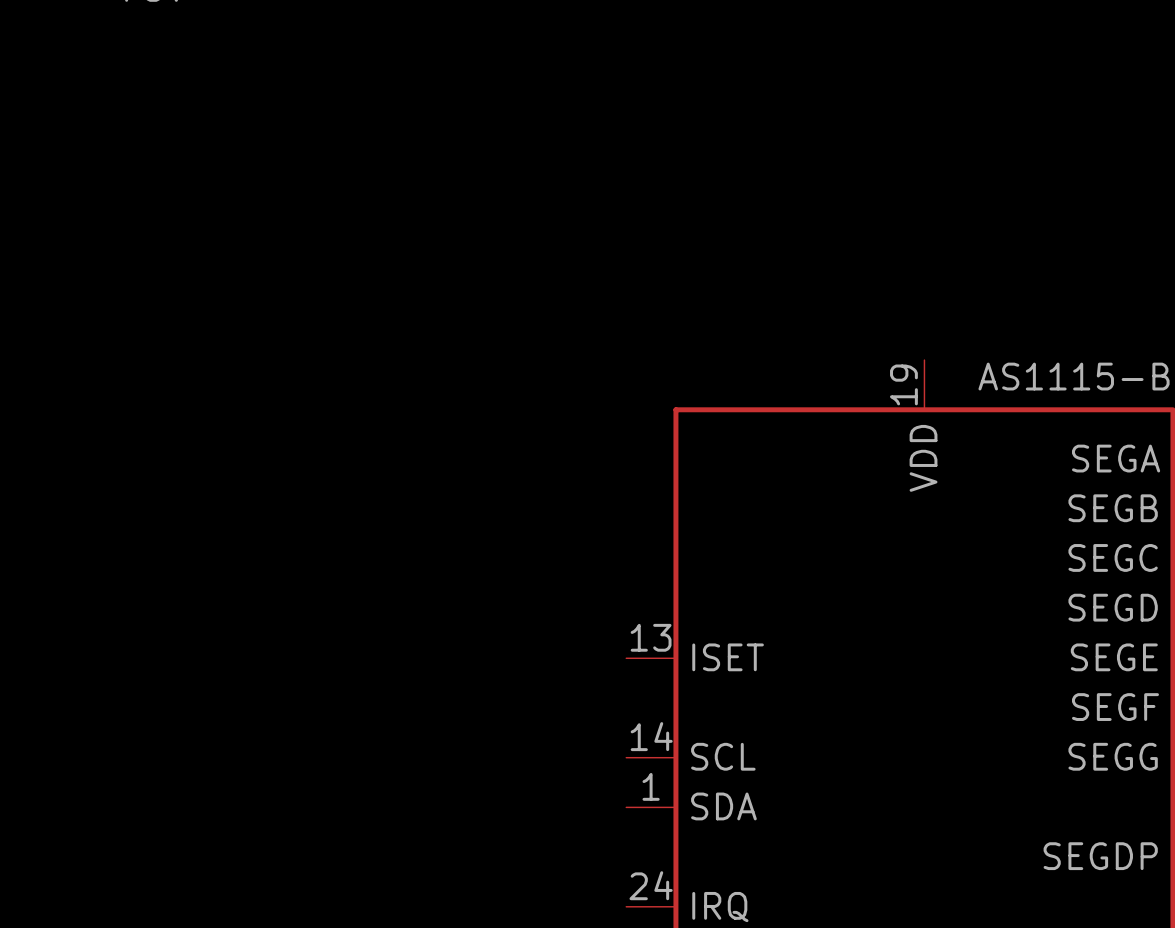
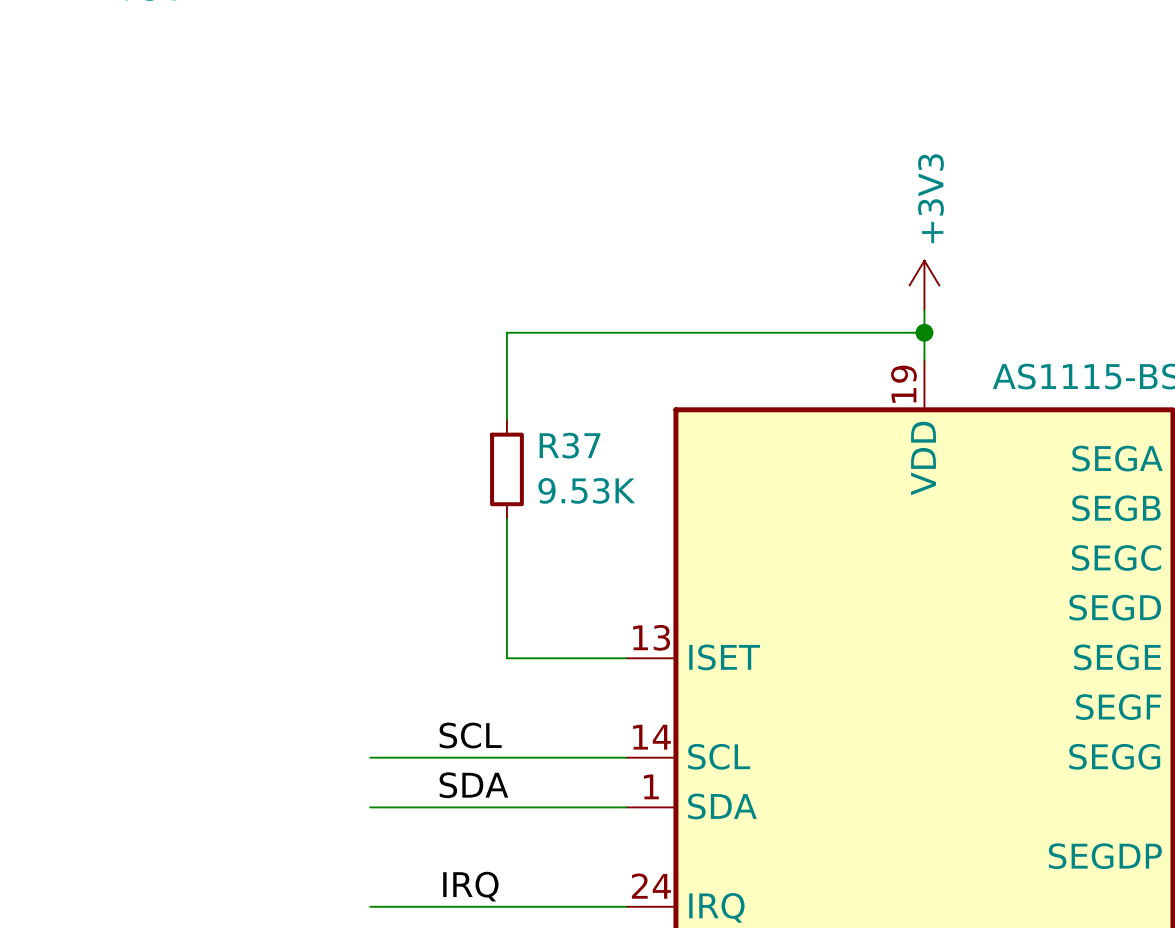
power symbol: none -> +3V3 (924, 285)
wire: none -> (924, 310) (924, 360)
wire: none -> (924, 332) (506, 332) (506, 419)
junction: none -> (924, 332)
R37: none -> 9.53K (506, 469)
wire: none -> (506, 519) (506, 658) (626, 658)
label: none -> SCL (470, 735)
wire: none -> (370, 757) (626, 757)
label: none -> SDA (473, 785)
wire: none -> (370, 807) (626, 807)
label: none -> IRQ (470, 886)
wire: none -> (370, 906) (626, 906)

